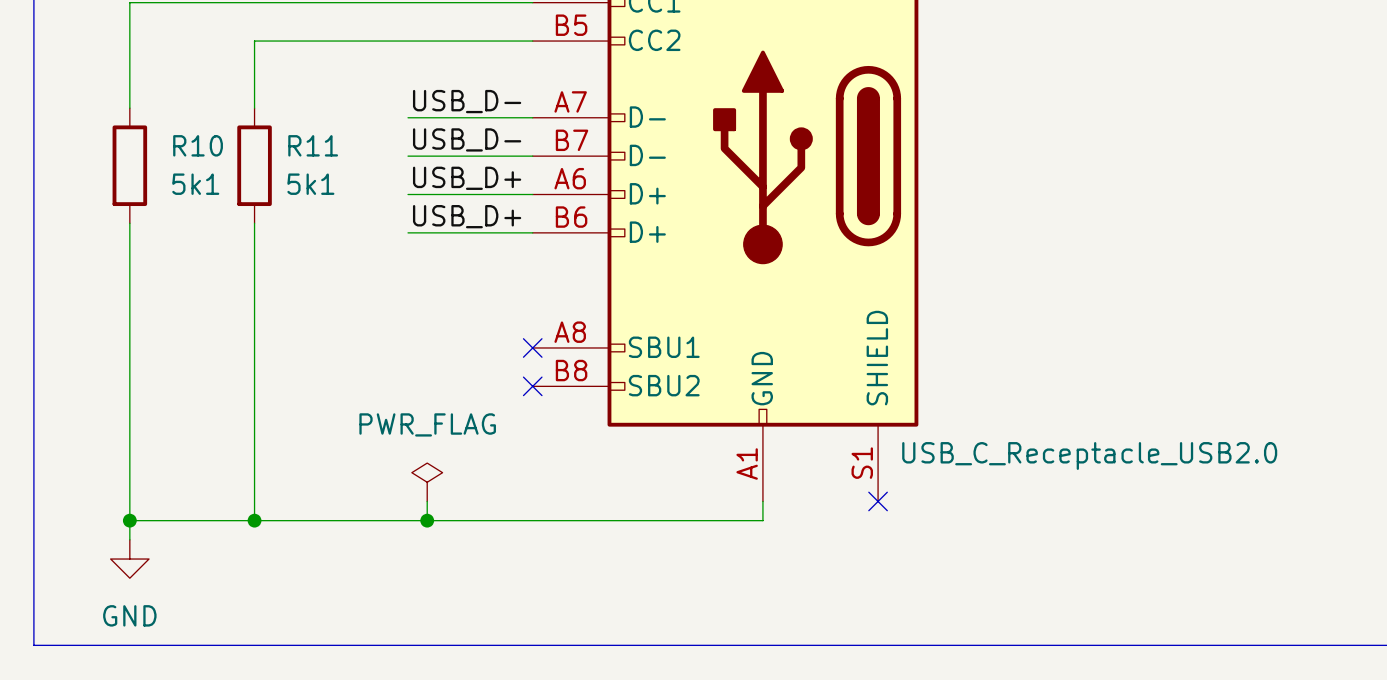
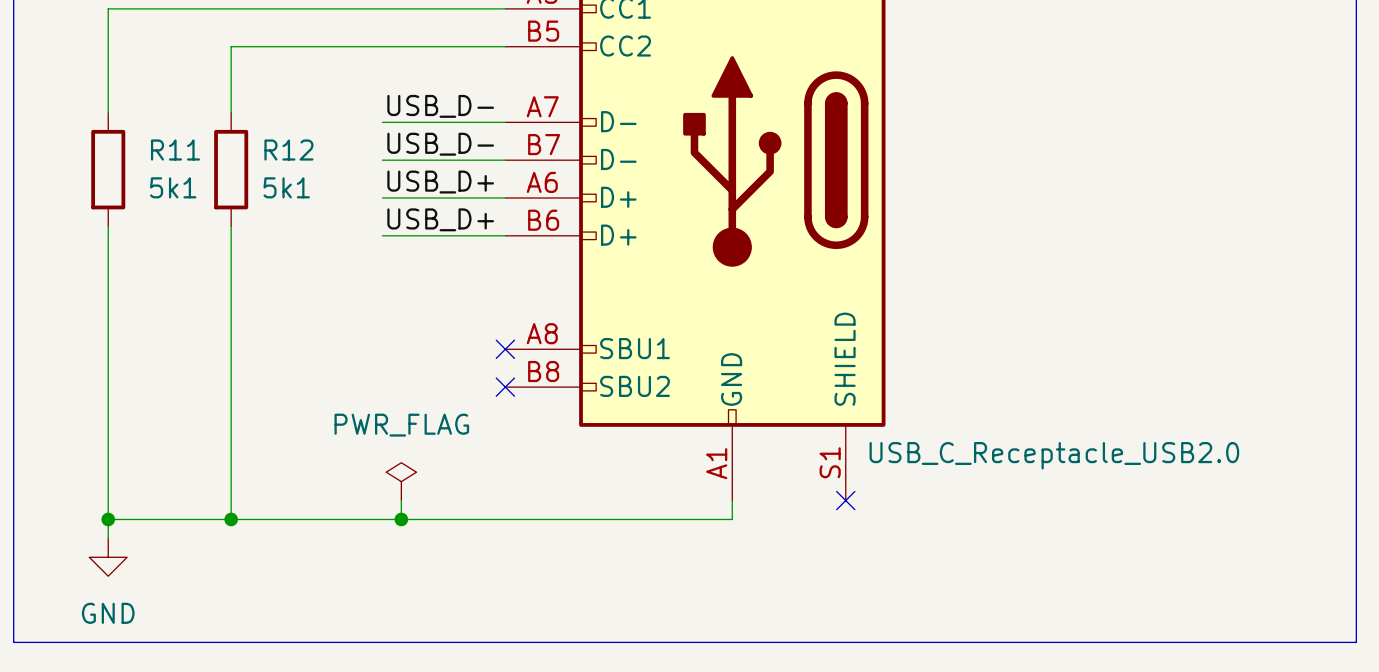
R10 name: R10 (198, 145) -> R11 (175, 150)
R11 name: R11 (313, 145) -> R12 (288, 150)

